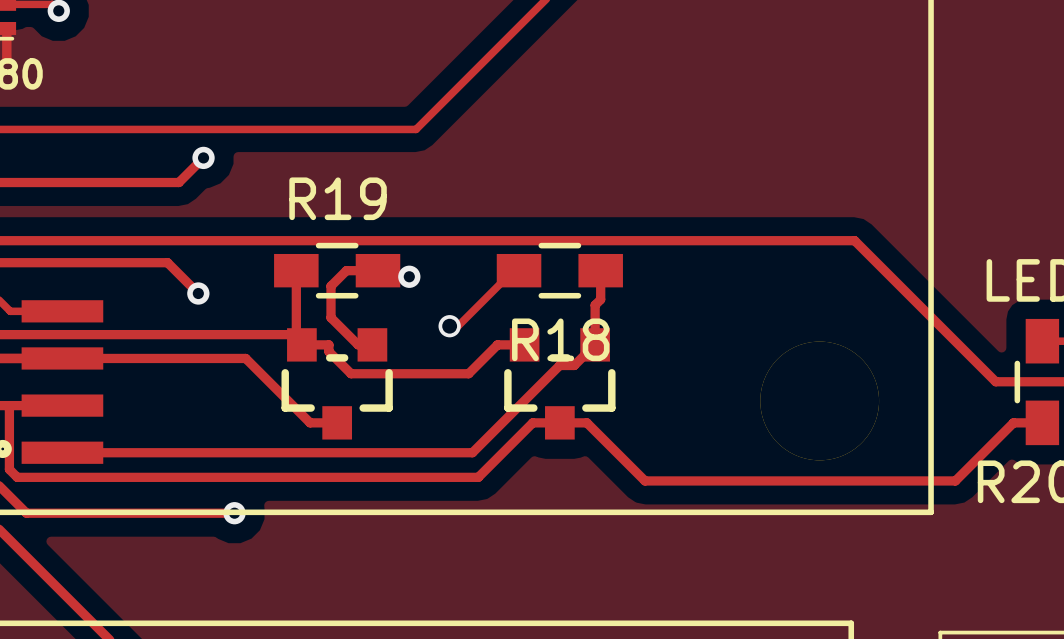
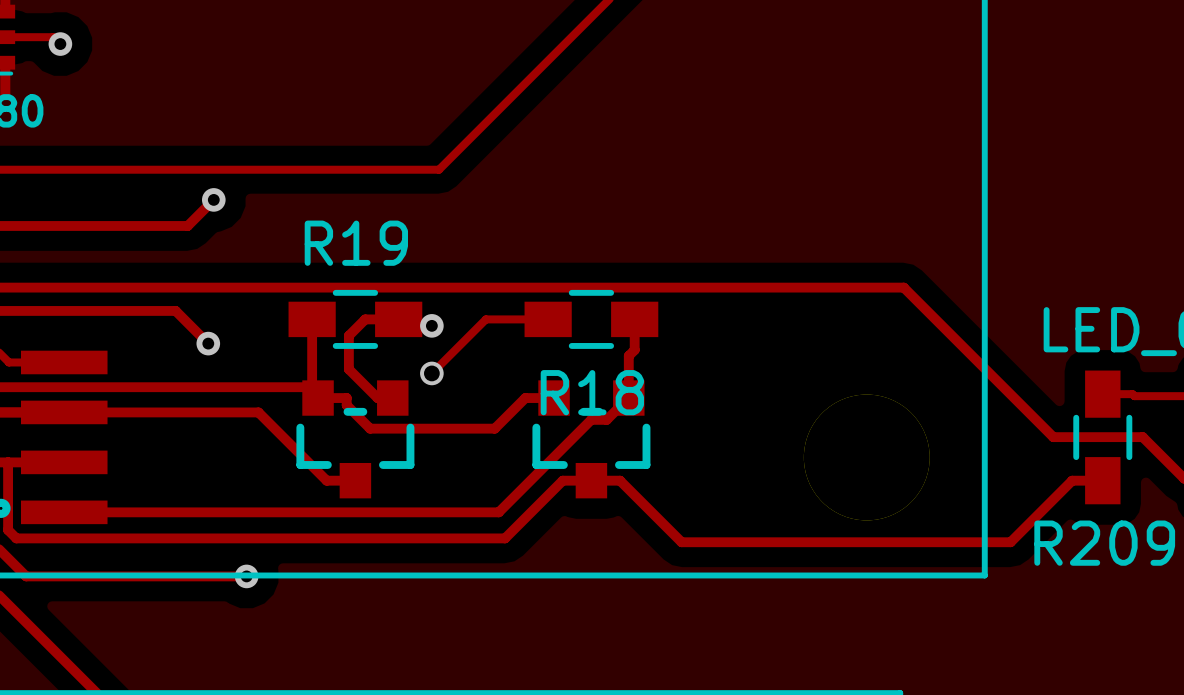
track: (513, 270) (457, 326) (449, 326) -> (542, 319) (485, 319) (431, 373)
via position: (449, 326) -> (431, 373)

